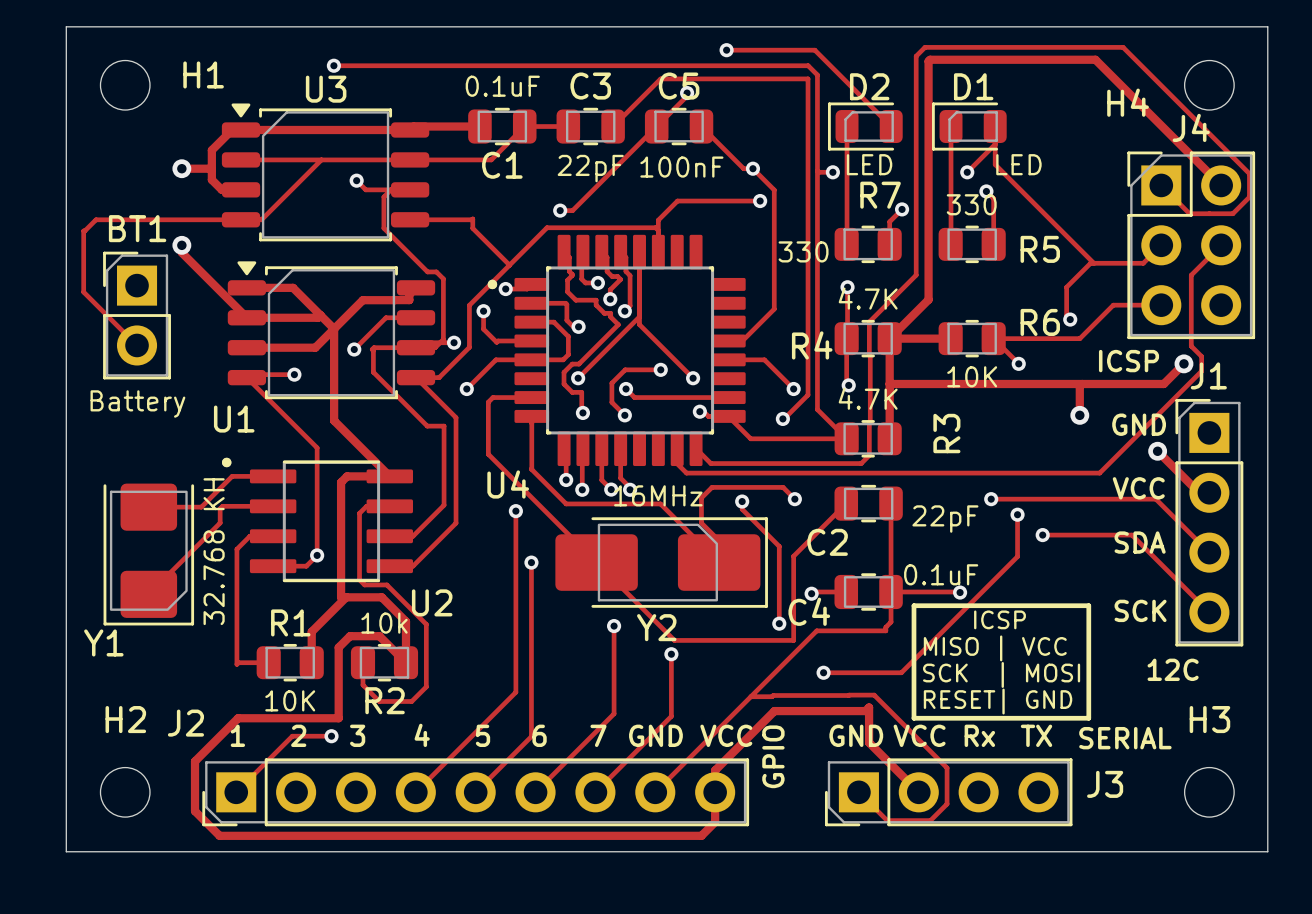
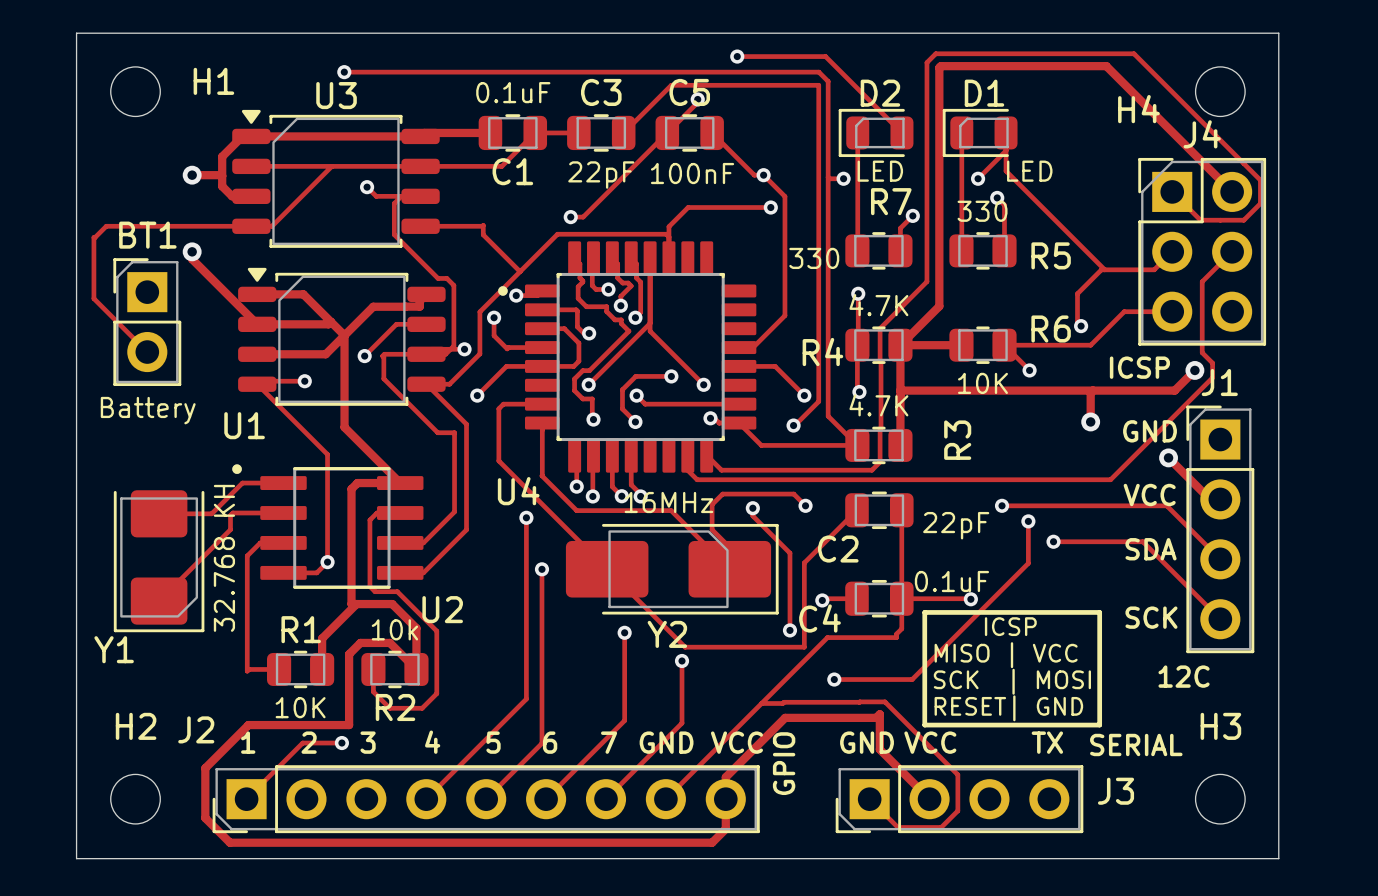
text: Rx (979, 735) -> none

